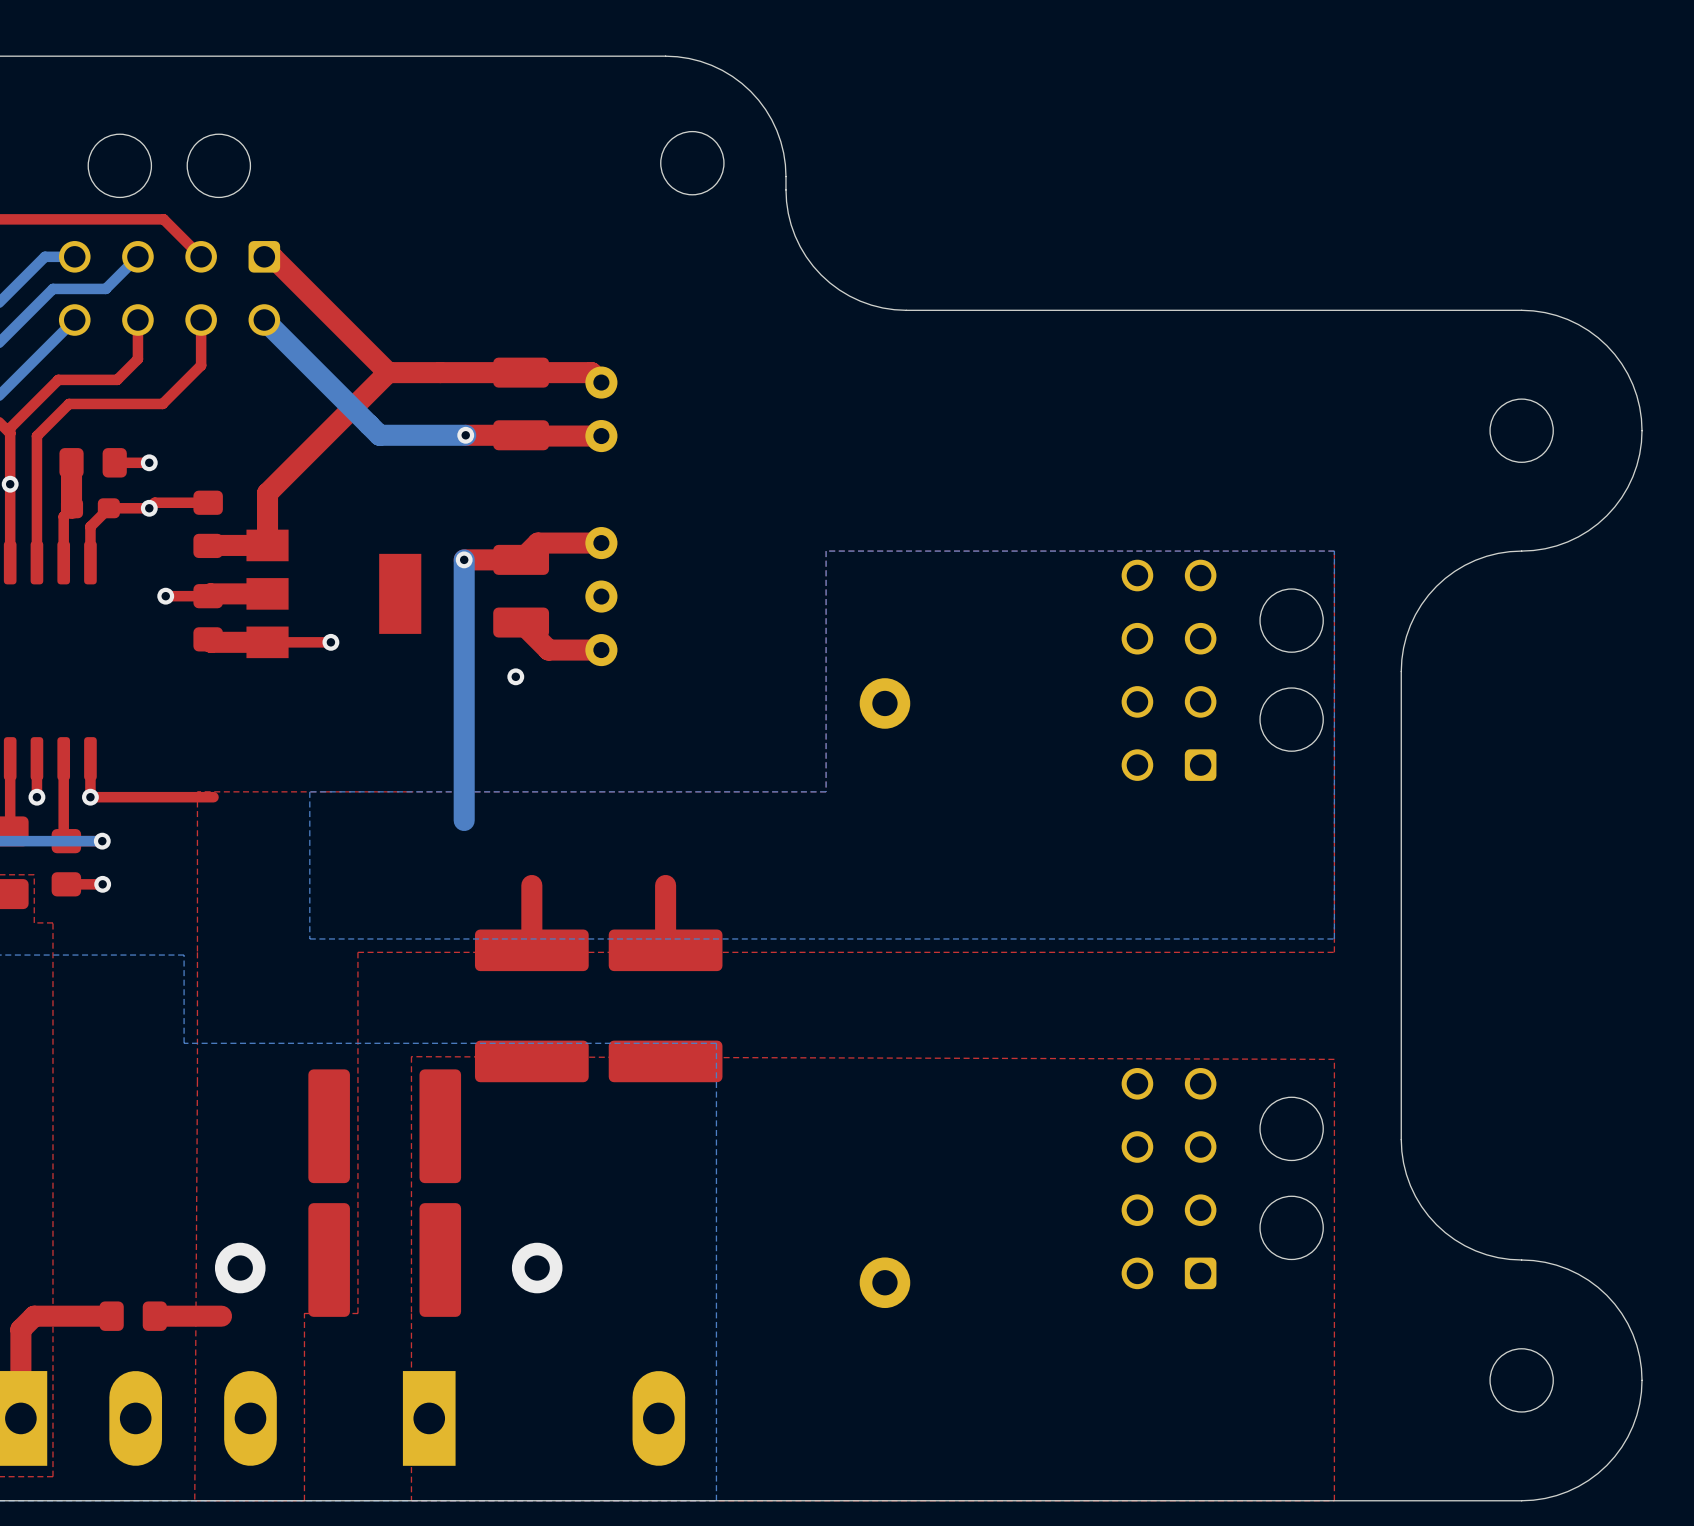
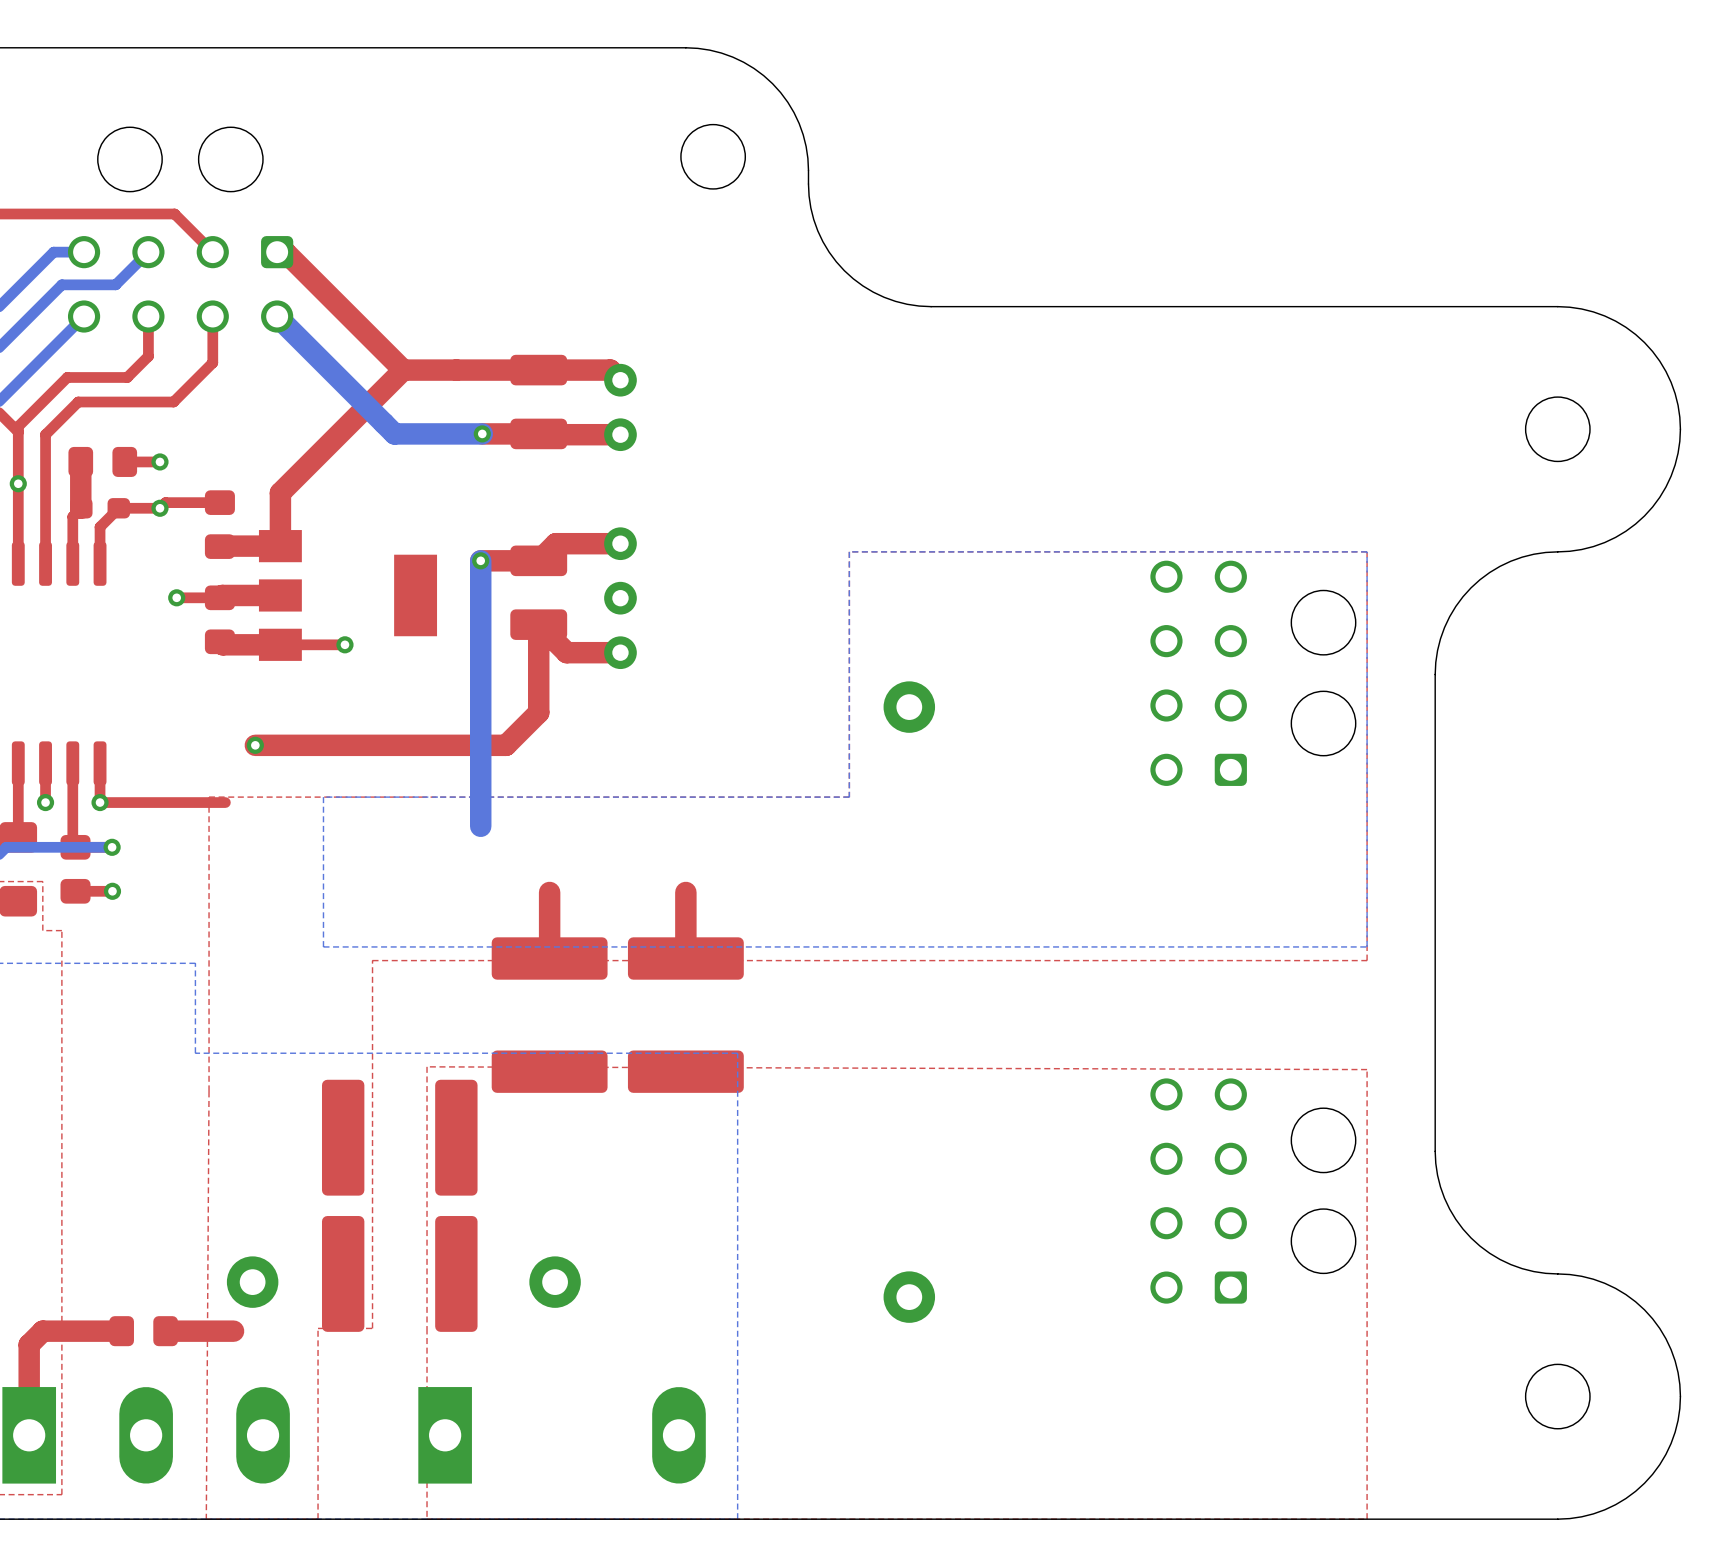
top track: none -> (538, 624) (538, 712) (506, 745) (255, 745)
via: (515, 676) -> none
via: none -> (255, 745)

